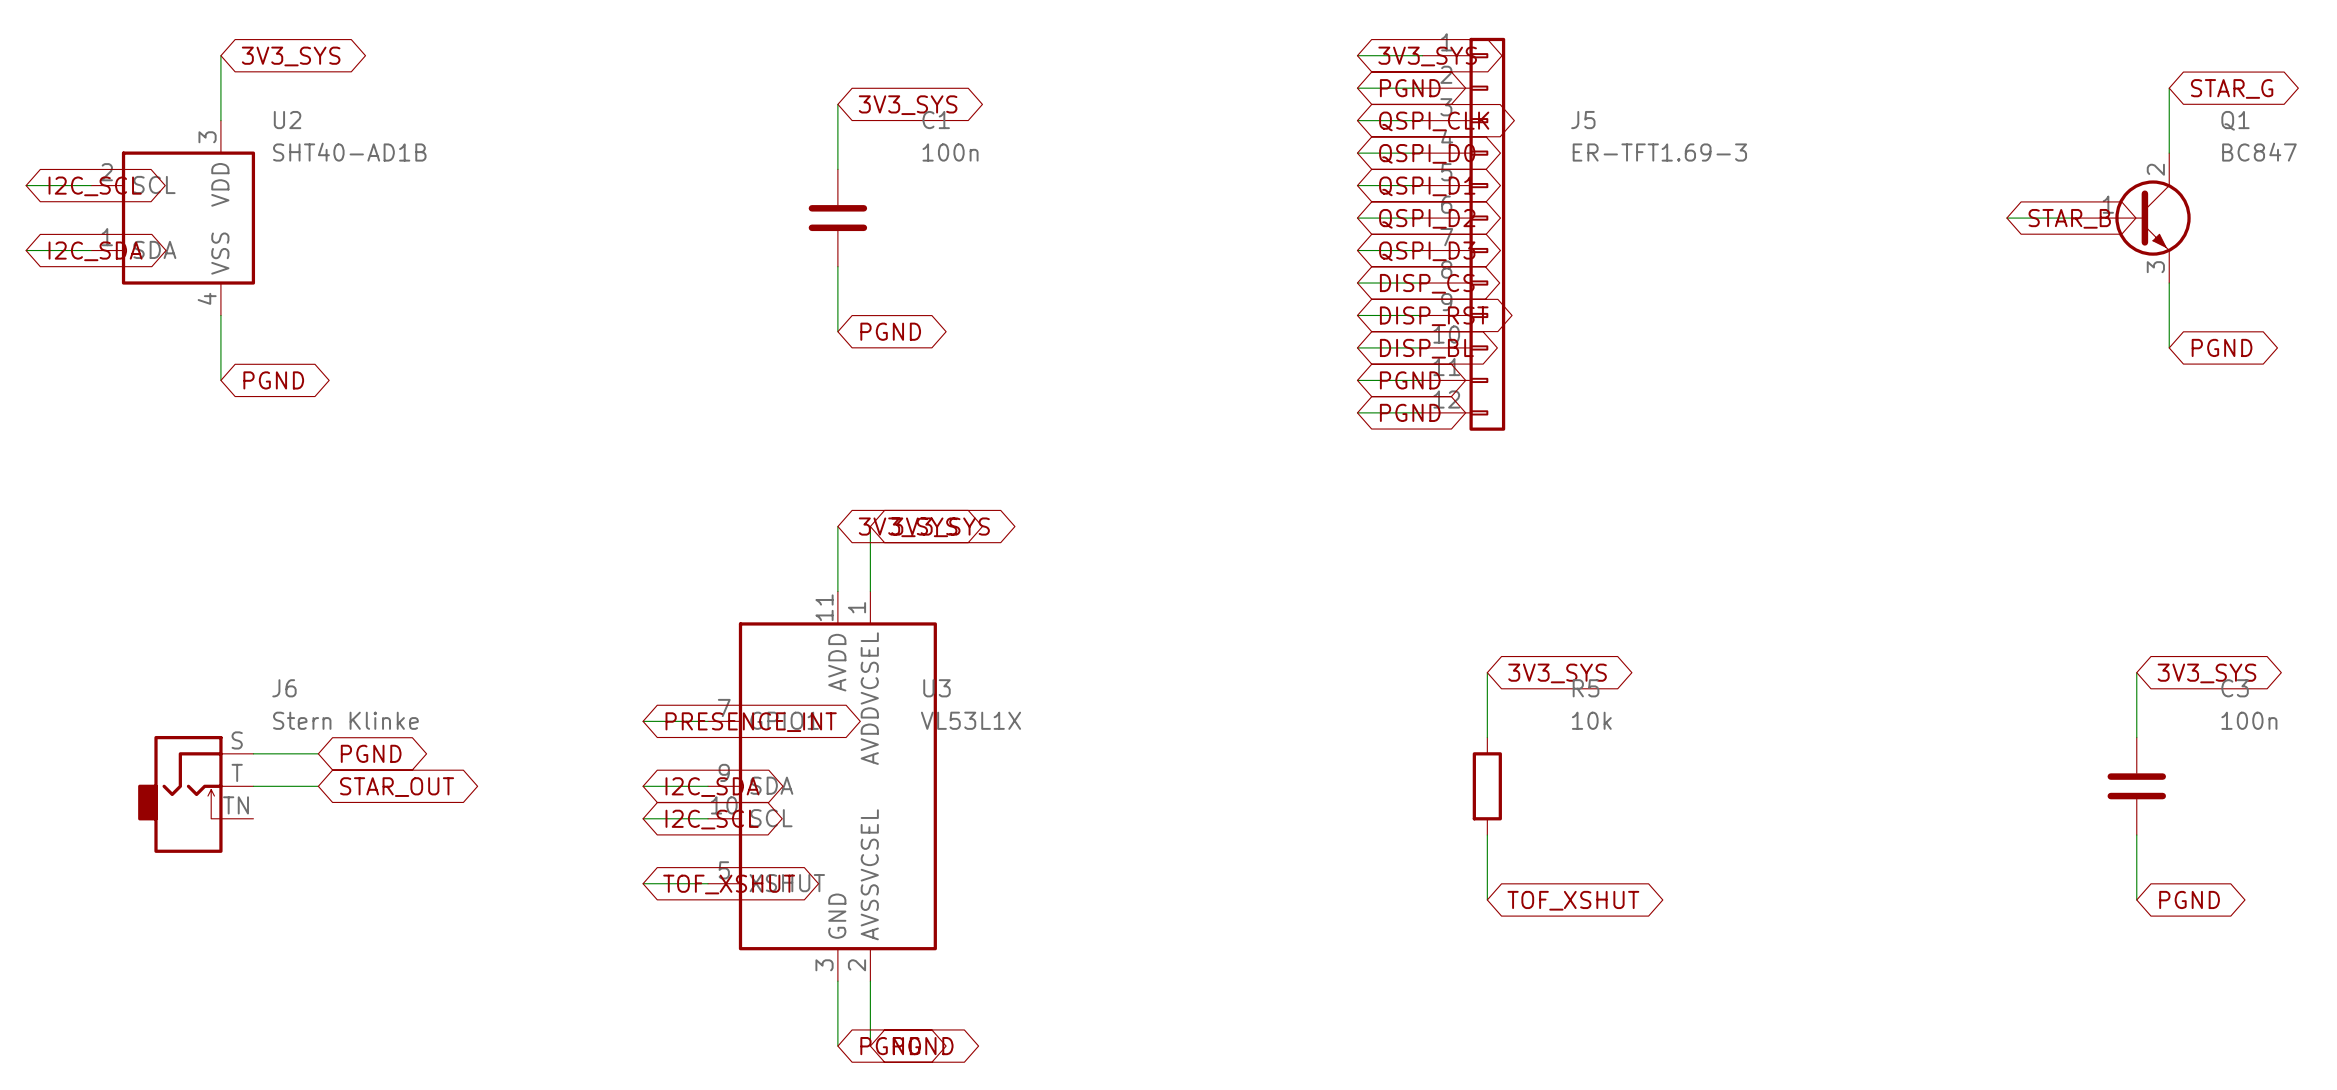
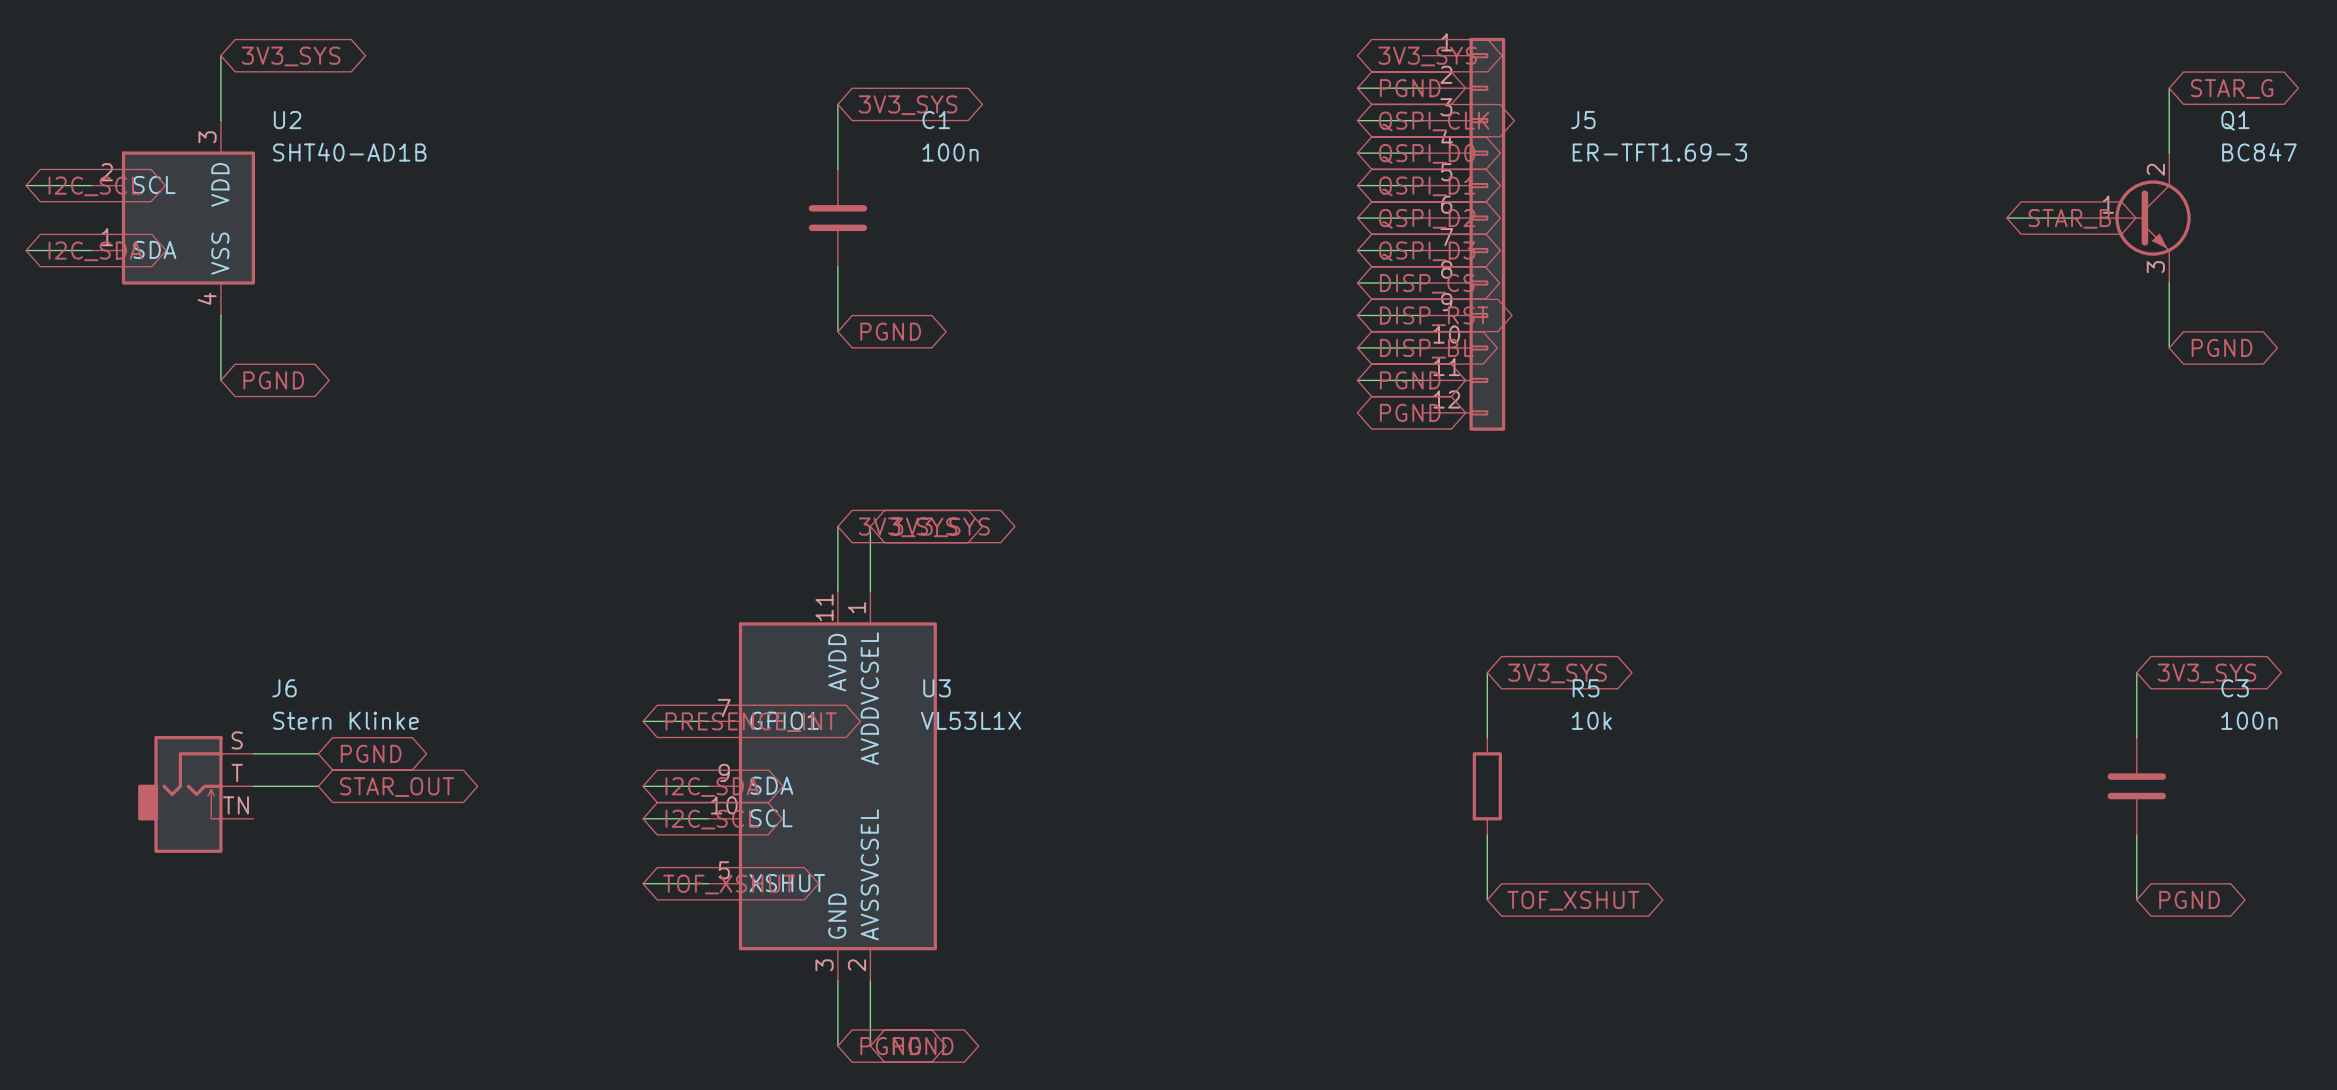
wire: (1357, 55) (1422, 55) -> none
wire: (1357, 412) (1422, 412) -> none

